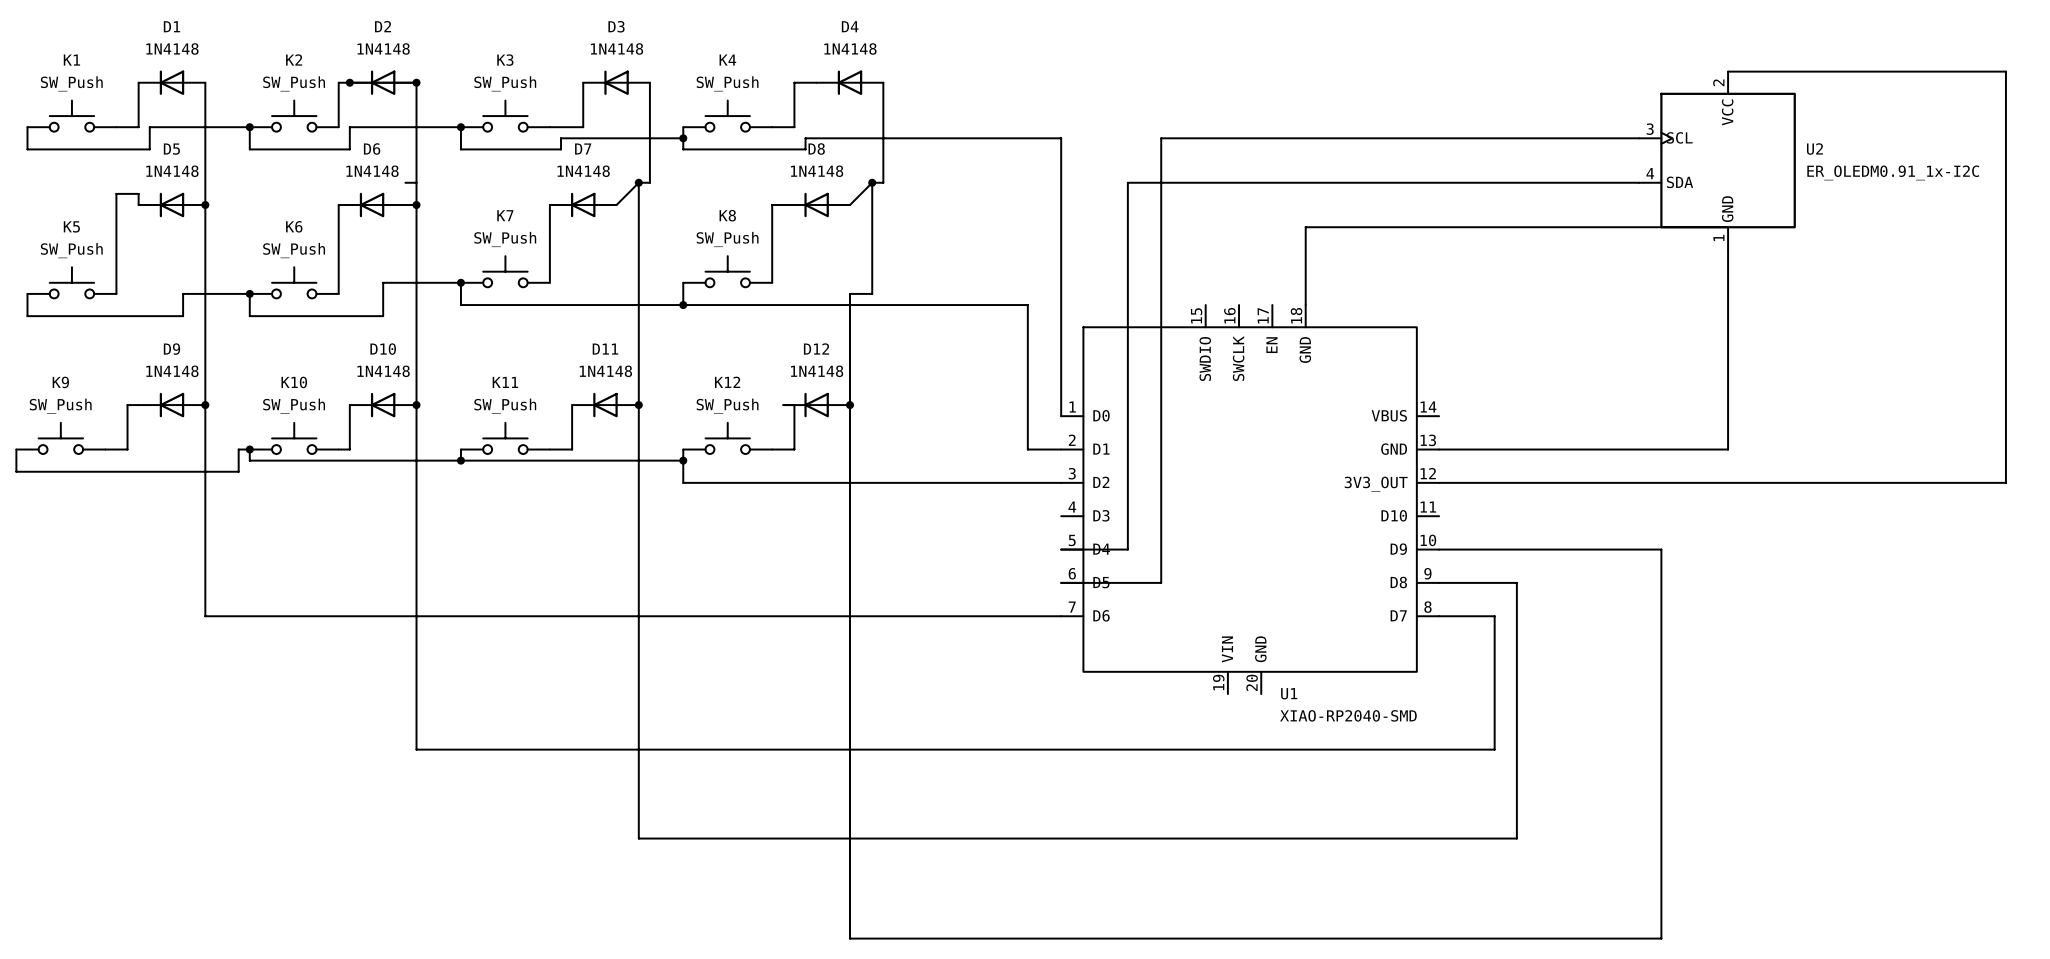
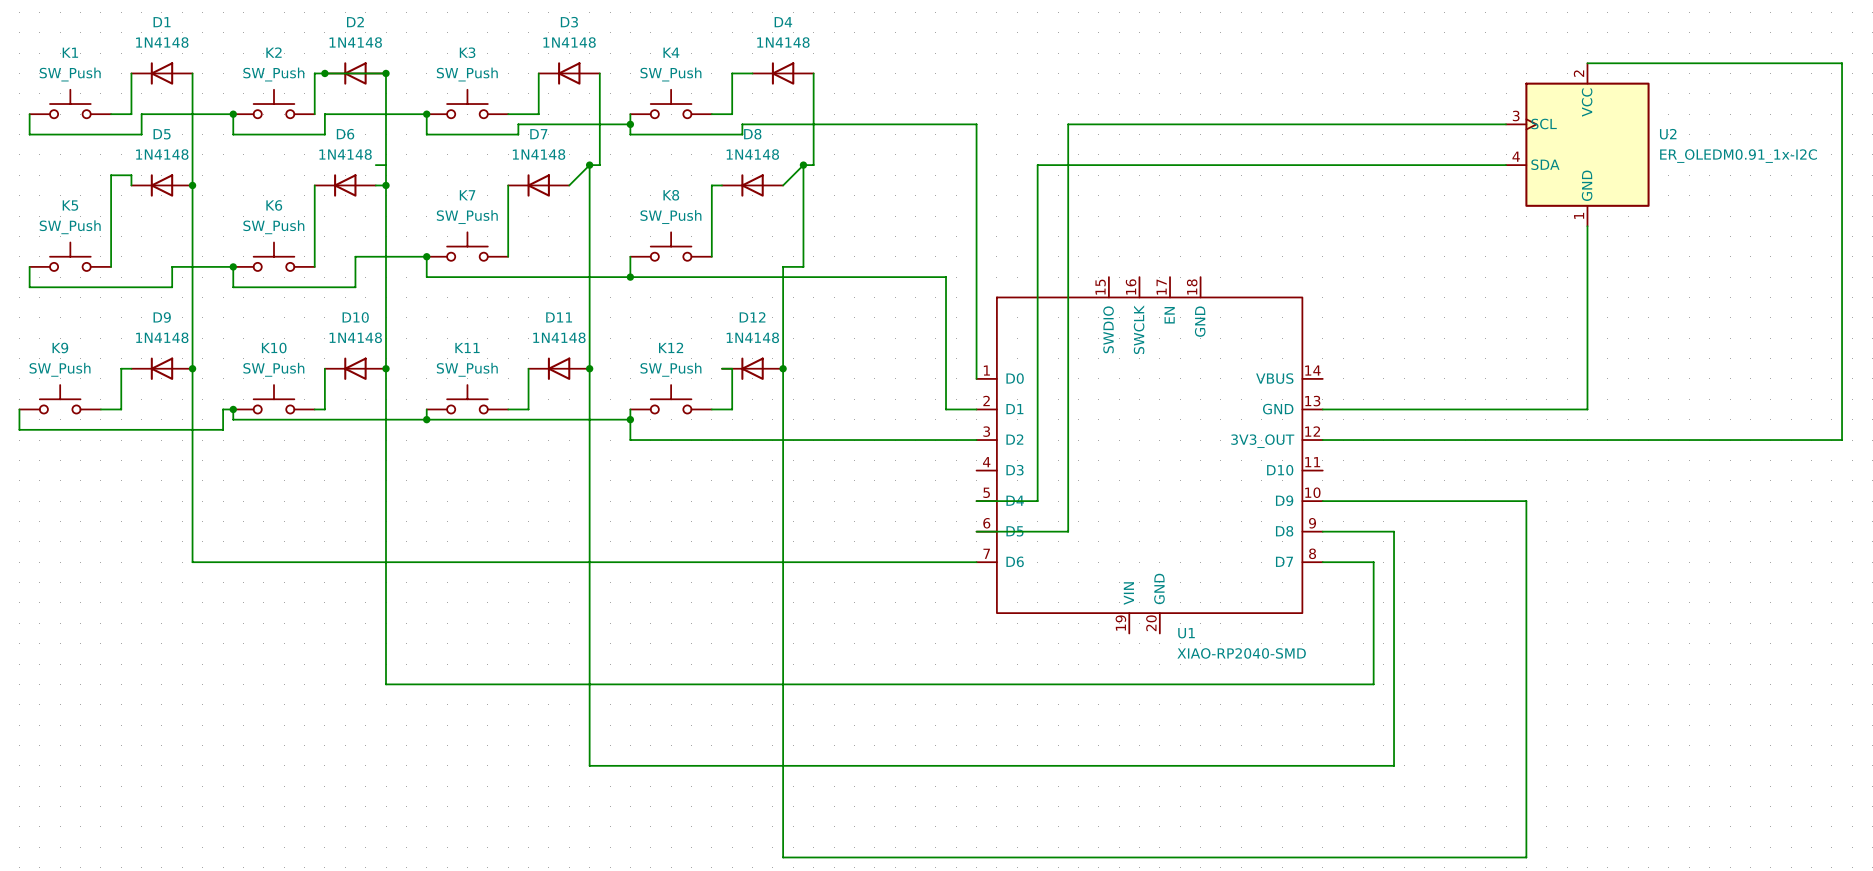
wire: (1728, 227) (1305, 227) (1305, 305) -> none

